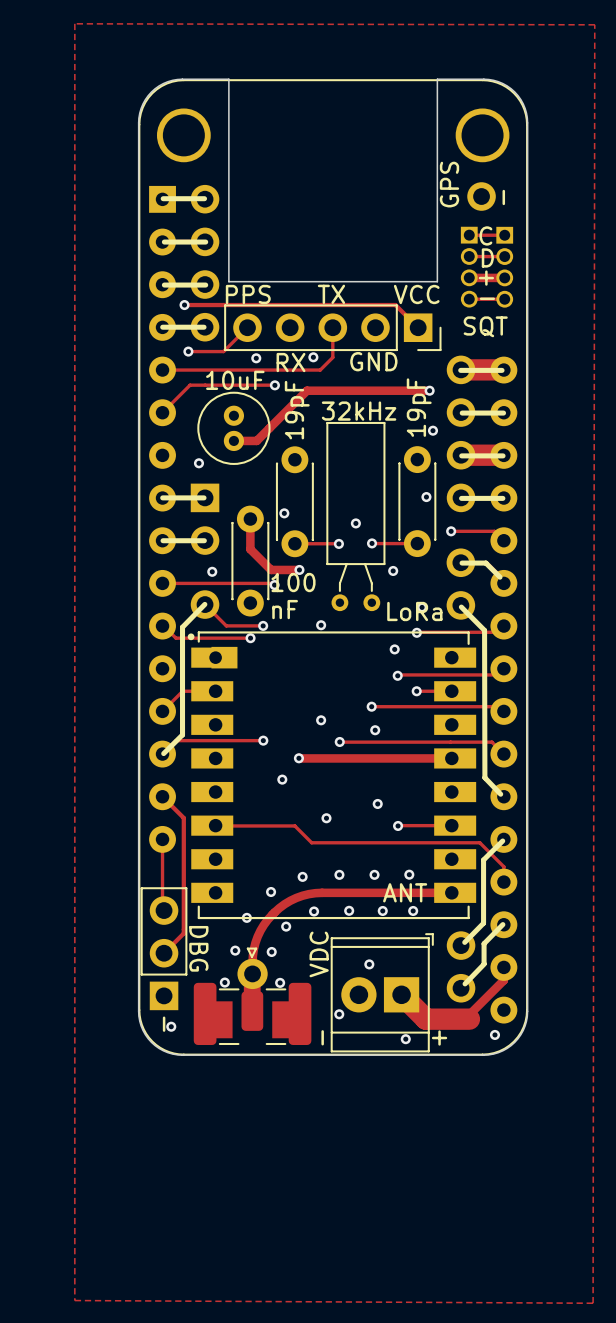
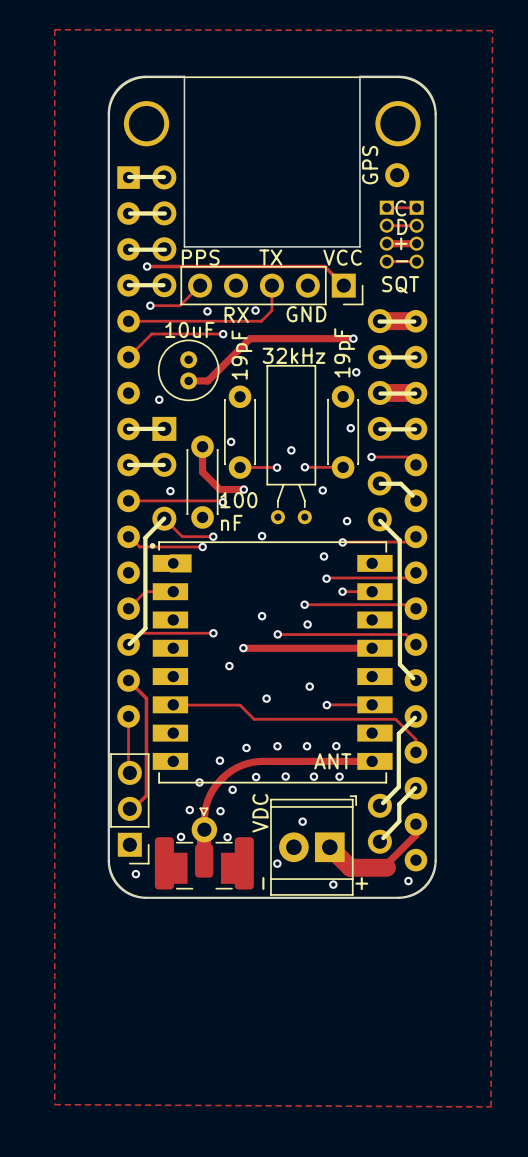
text: - (503, 197) -> none
part text: LoRa (414, 611) -> none
part footprint: [140, 887, 188, 1011] -> [110, 753, 150, 865]
text: DBG (198, 948) -> none
text: - (164, 1024) -> none

